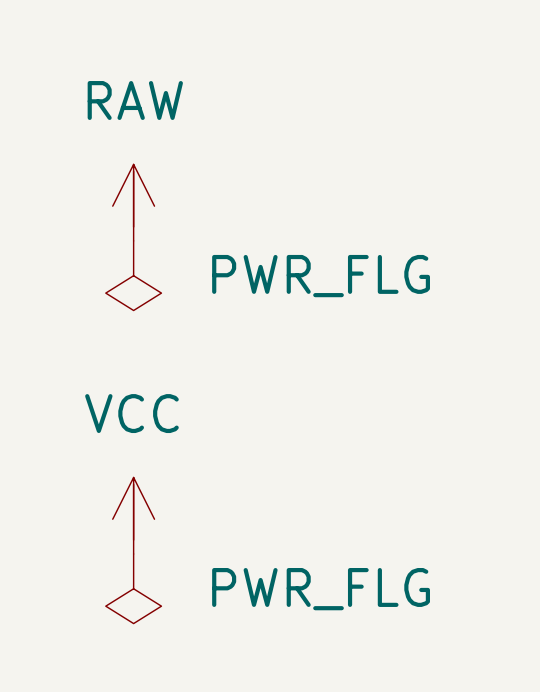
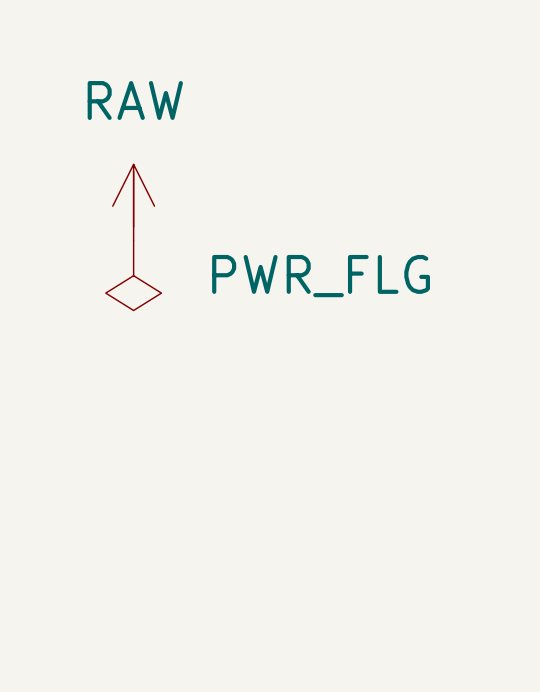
power symbol: VCC (133, 515) -> none
power symbol: PWR_FLG (133, 588) -> none

